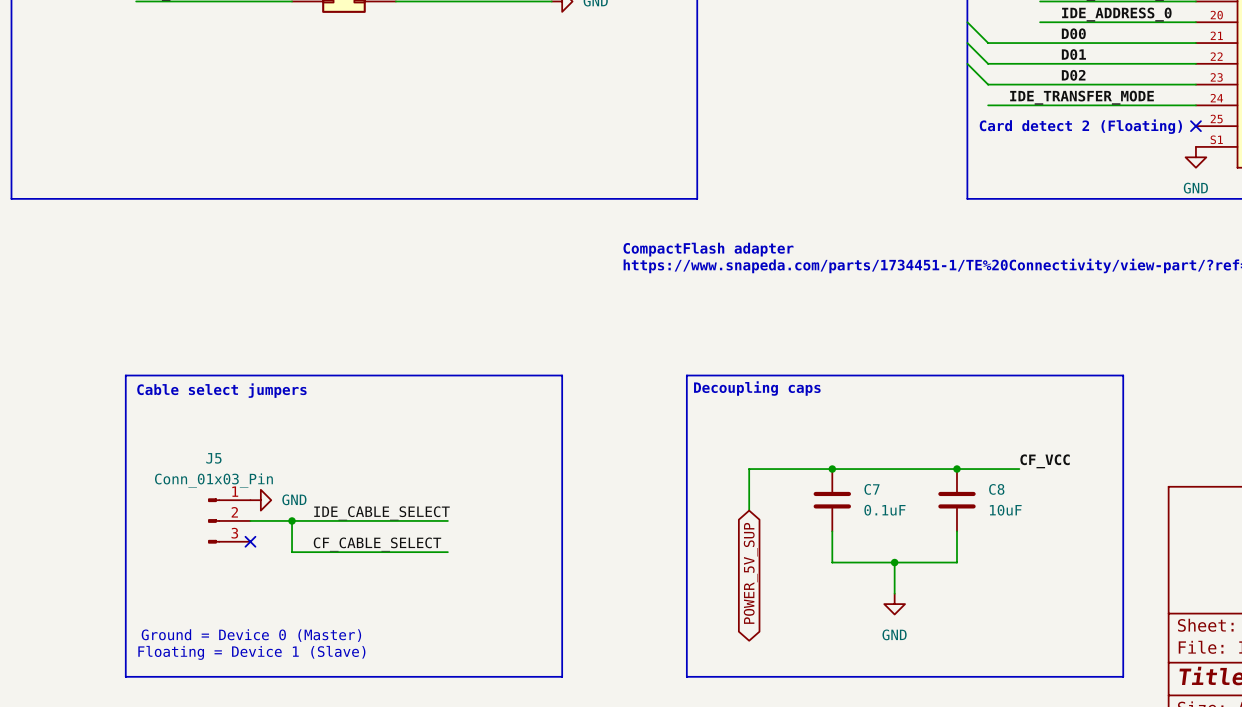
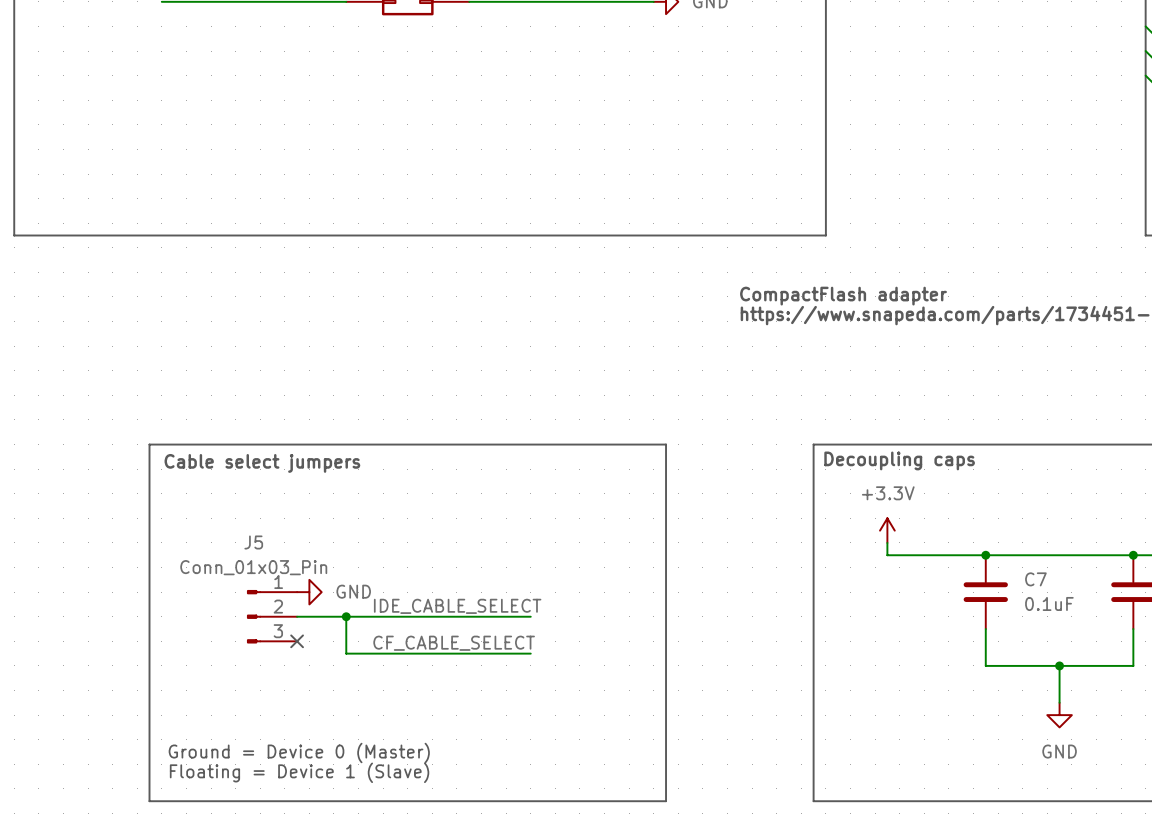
power symbol: none -> +3.3V (887, 530)
wire: (749, 469) (749, 510) -> (887, 555) (887, 542)
global label: POWER_5V_SUP (750, 573) -> none

